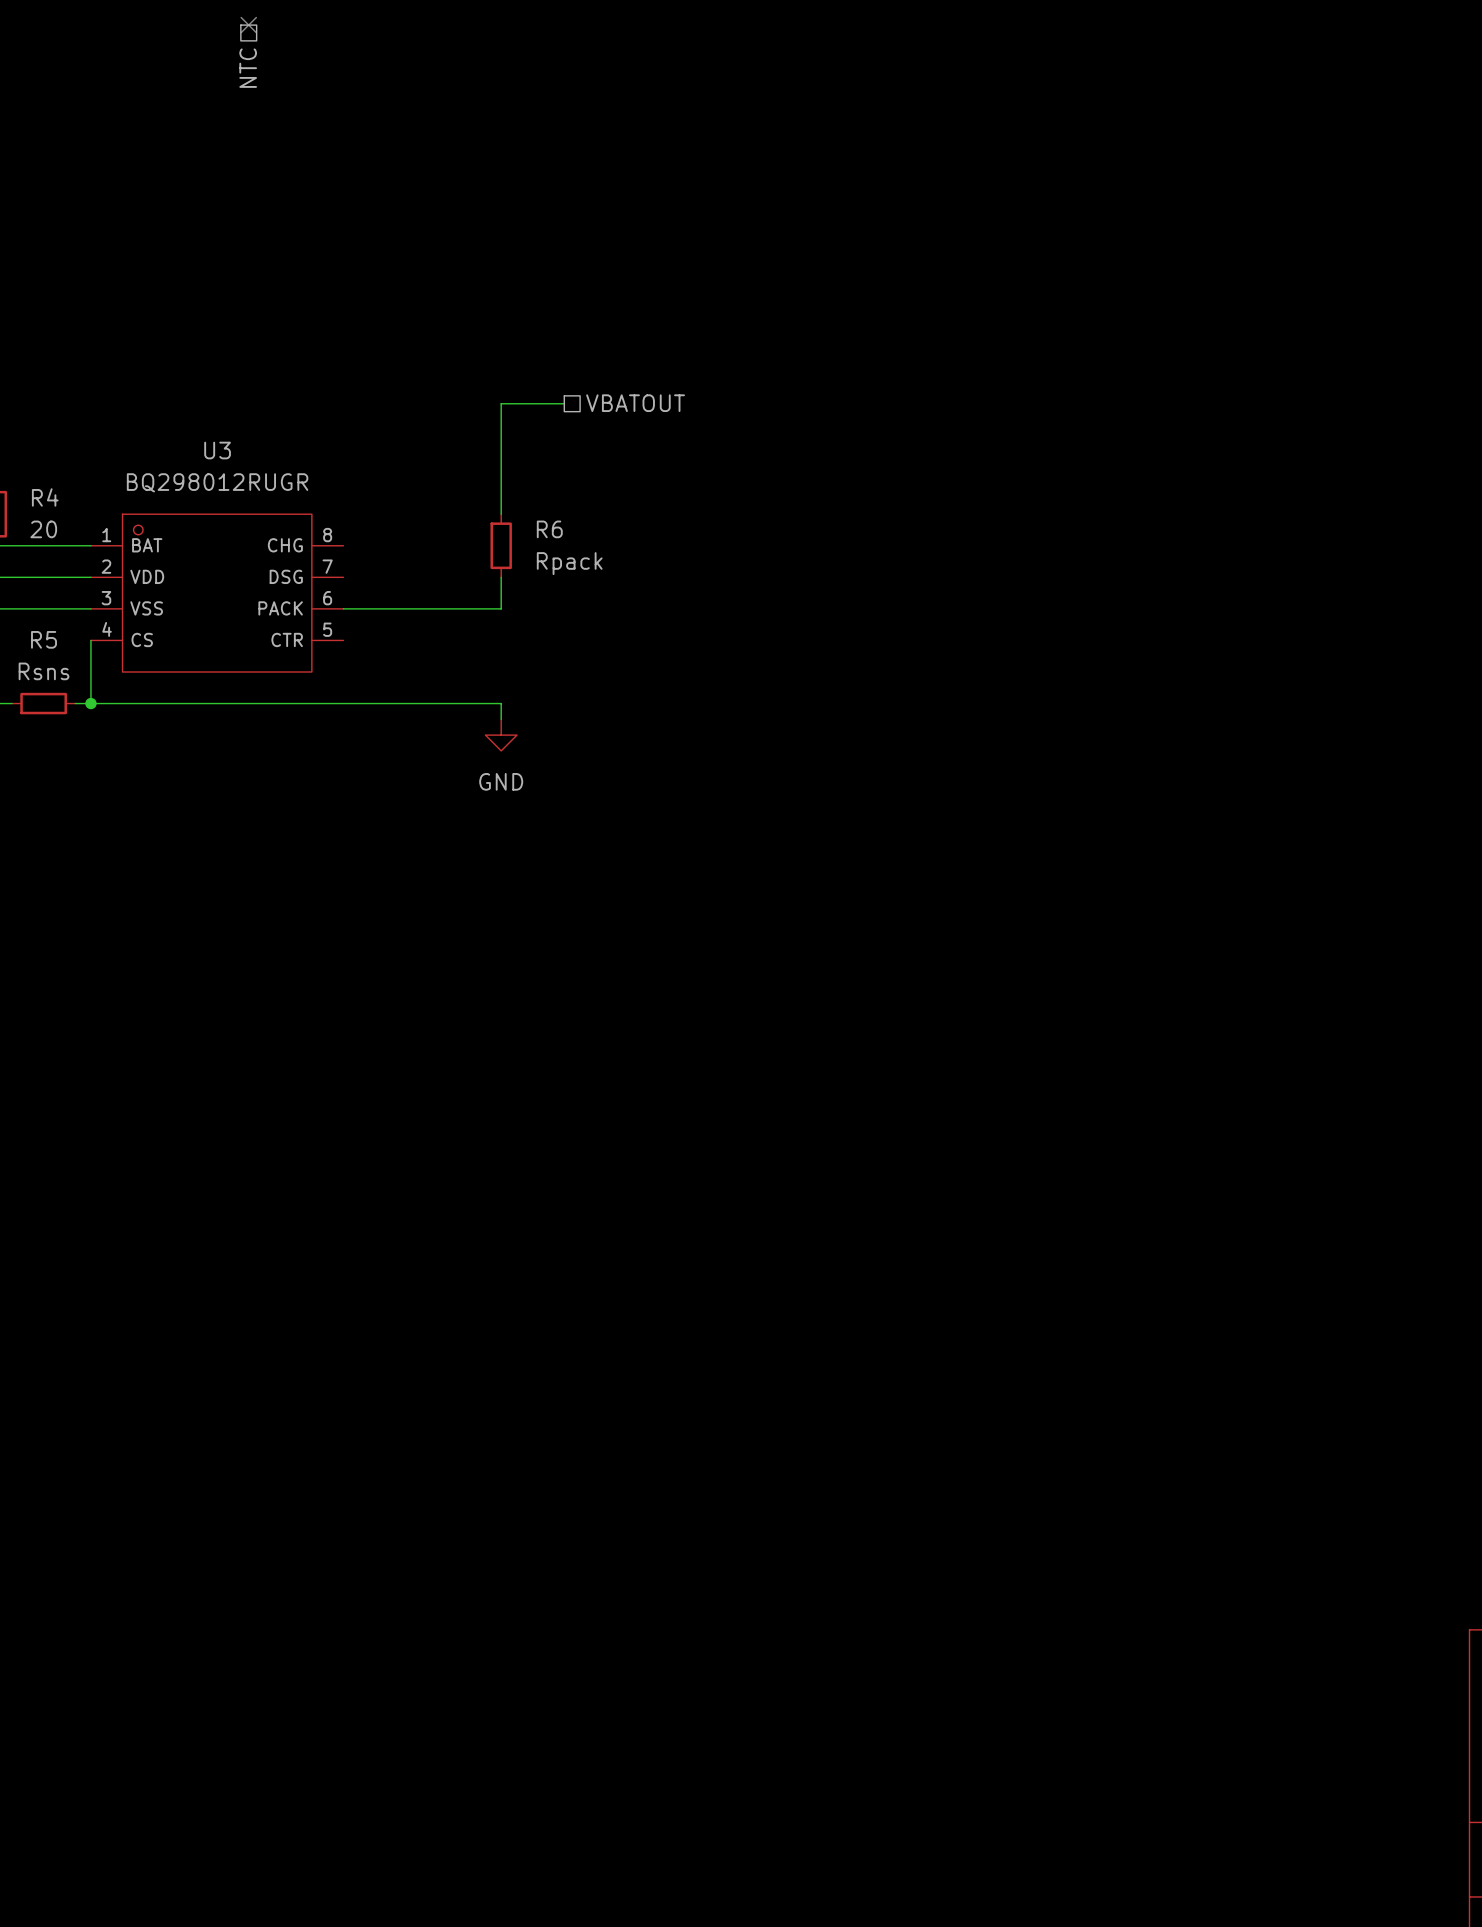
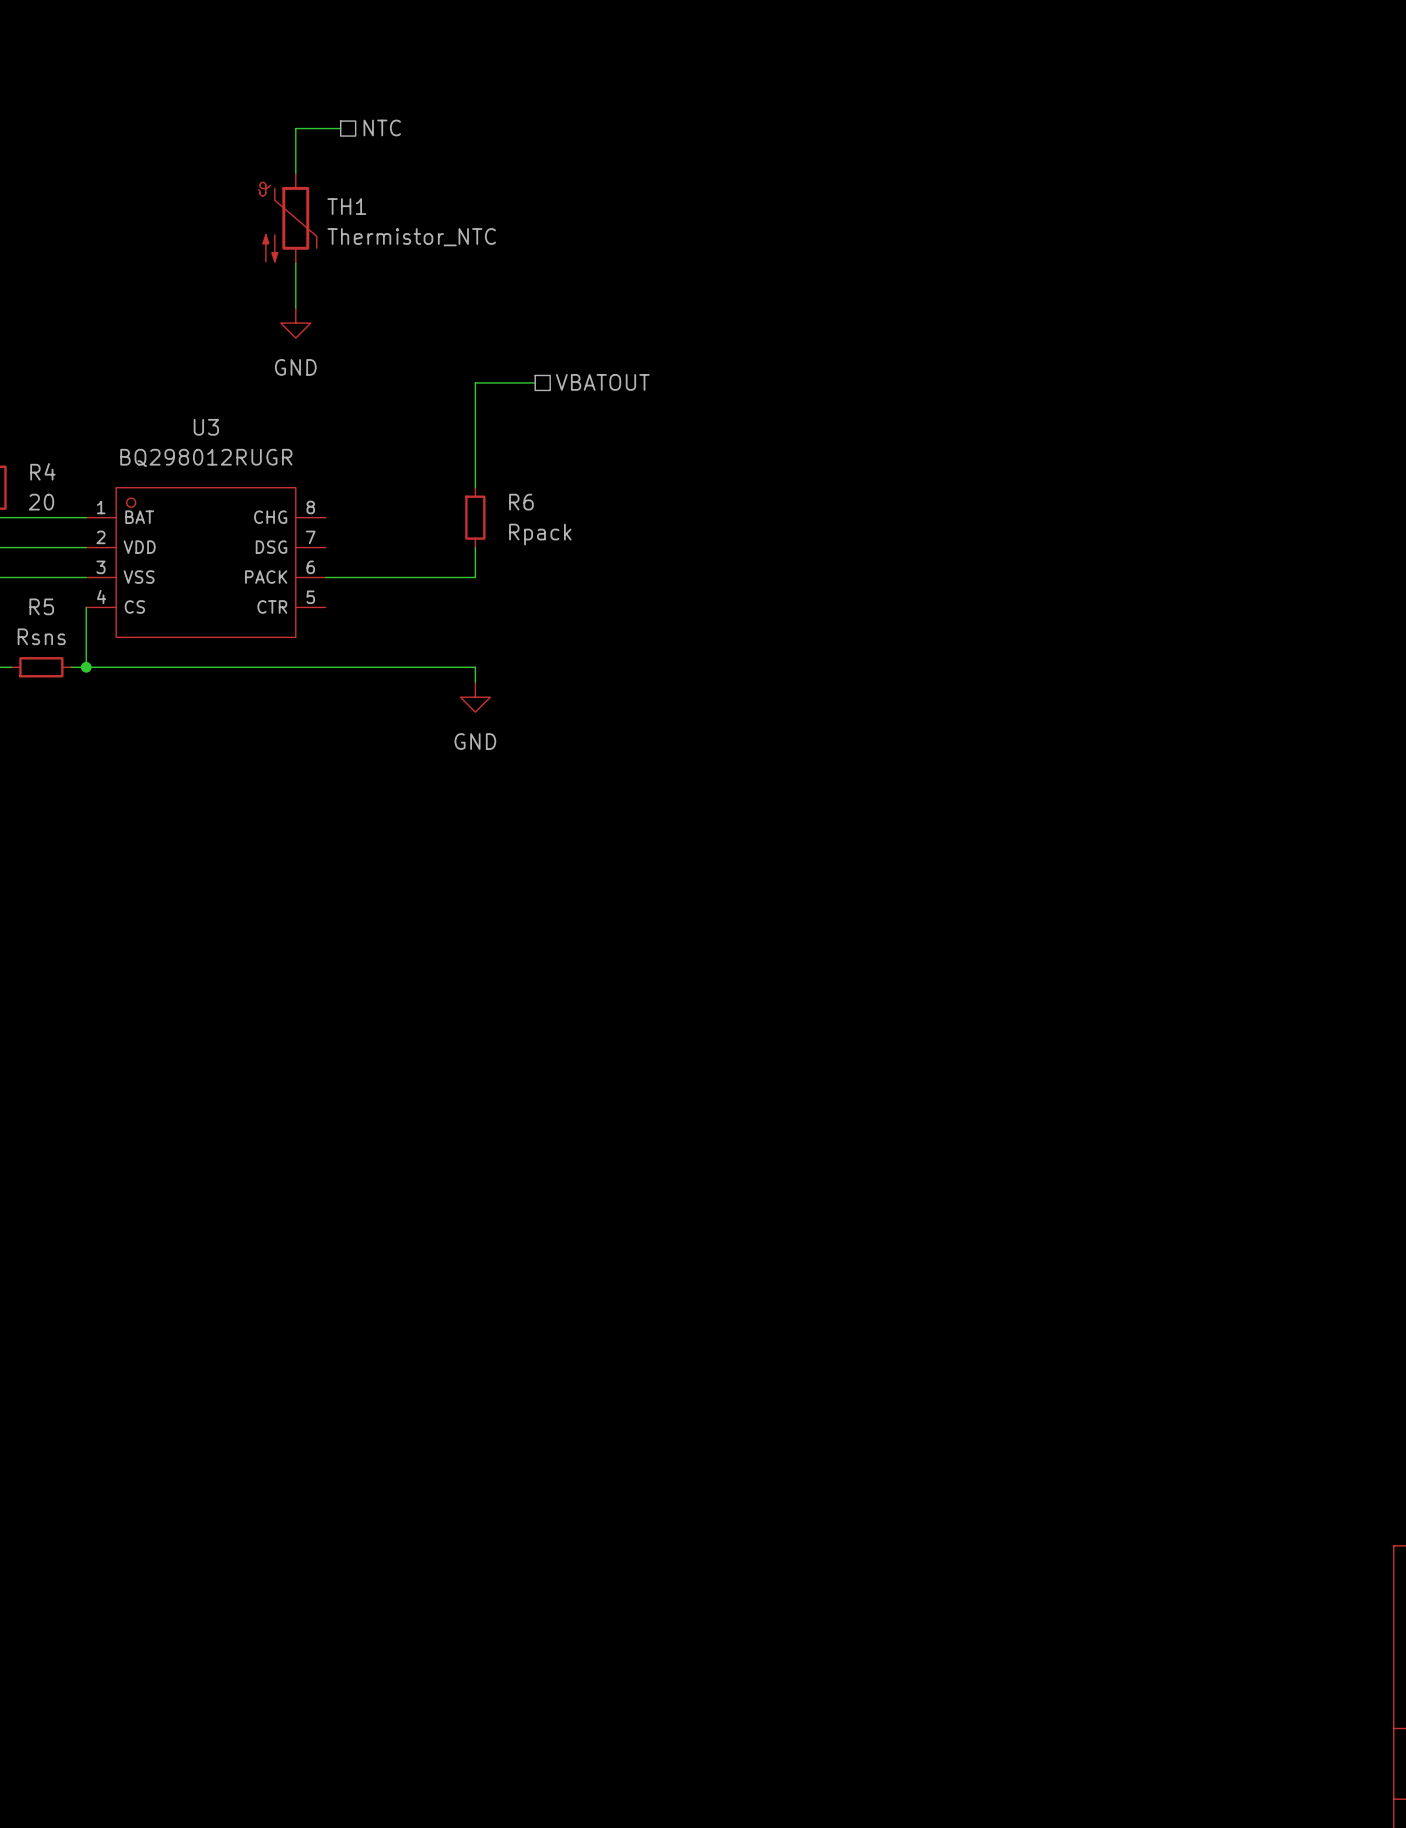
no-connect mark: (248, 25) -> none
hierarchical label rotation: 0° (248, 68) -> 90° counterclockwise (382, 127)
hierarchical label position: NTC (248, 68) -> NTC (382, 127)
wire: none -> (340, 128) (295, 128) (295, 173)
TH1: none -> Thermistor_NTC (287, 218)
wire: none -> (295, 263) (295, 308)
power symbol: none -> GND (295, 323)

